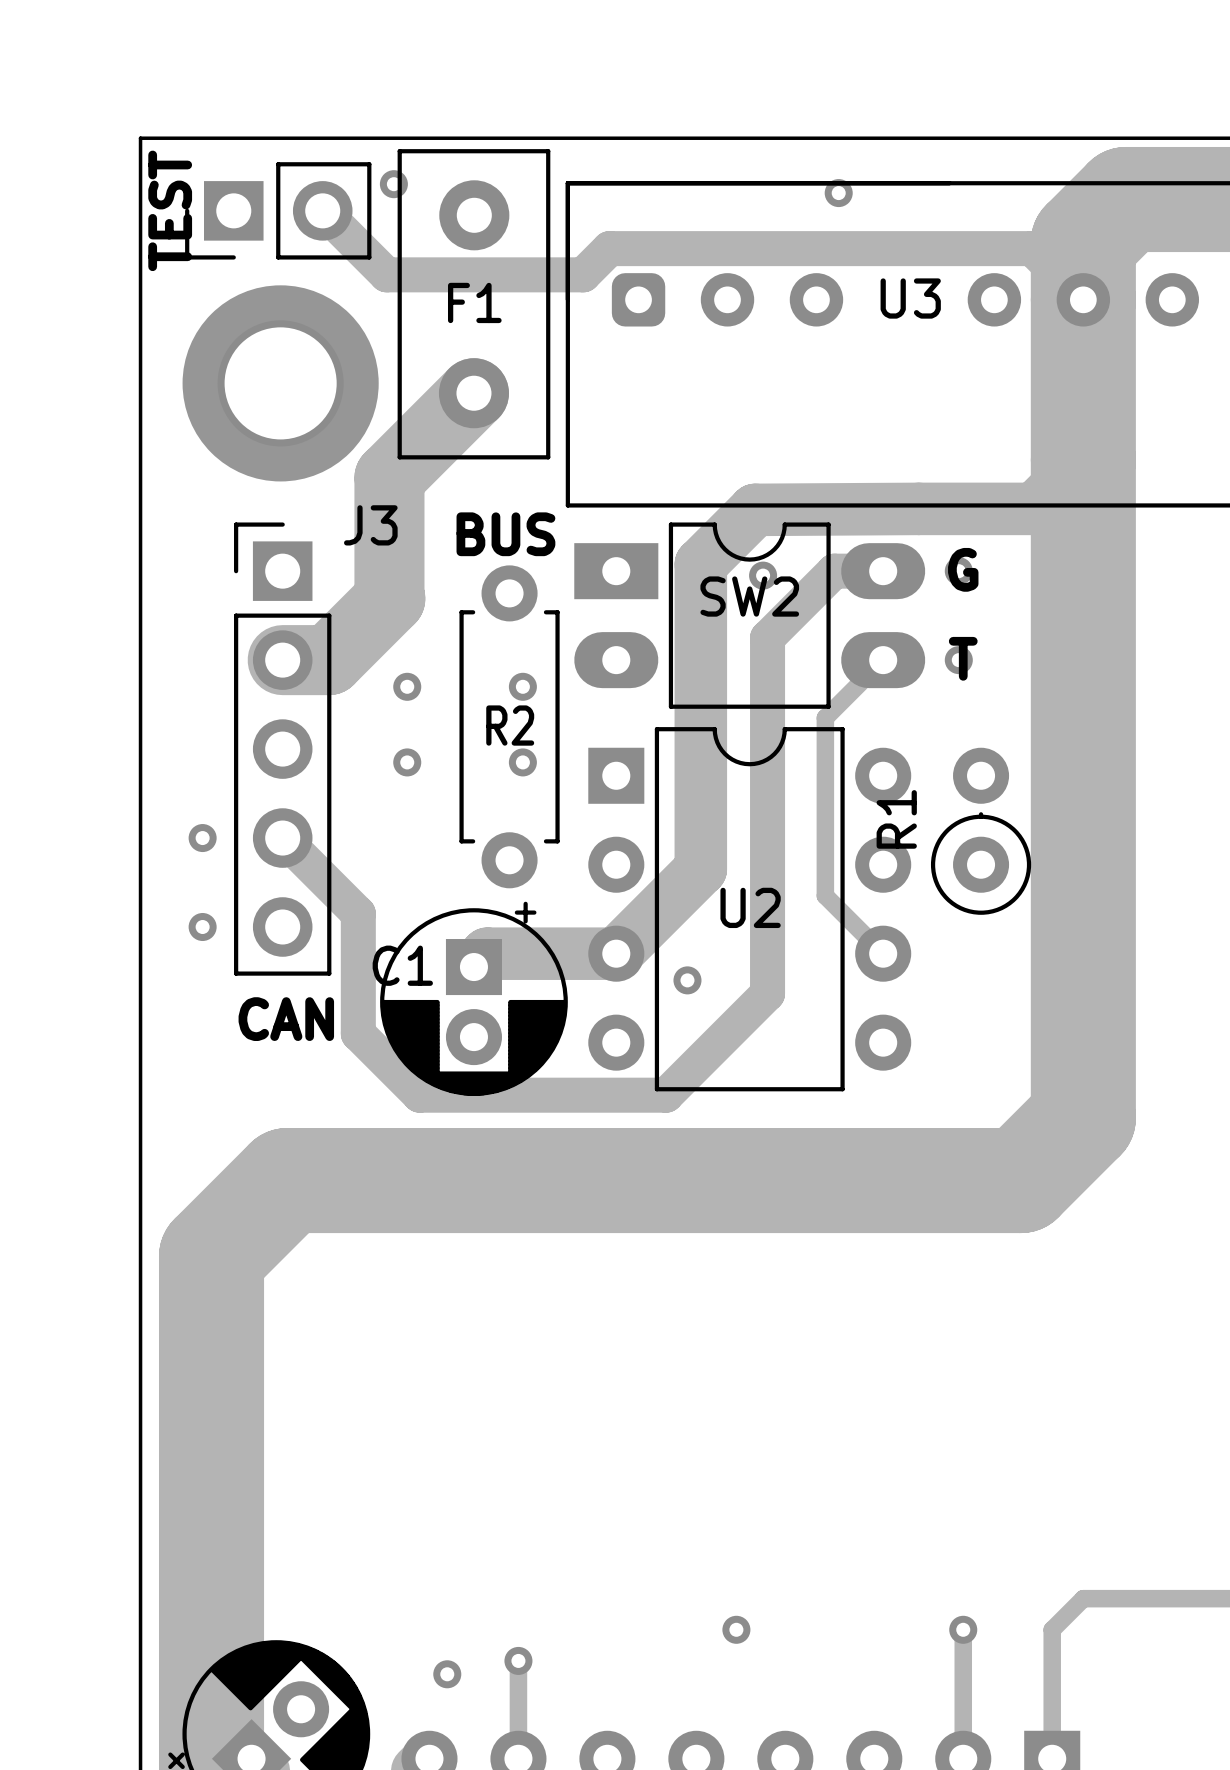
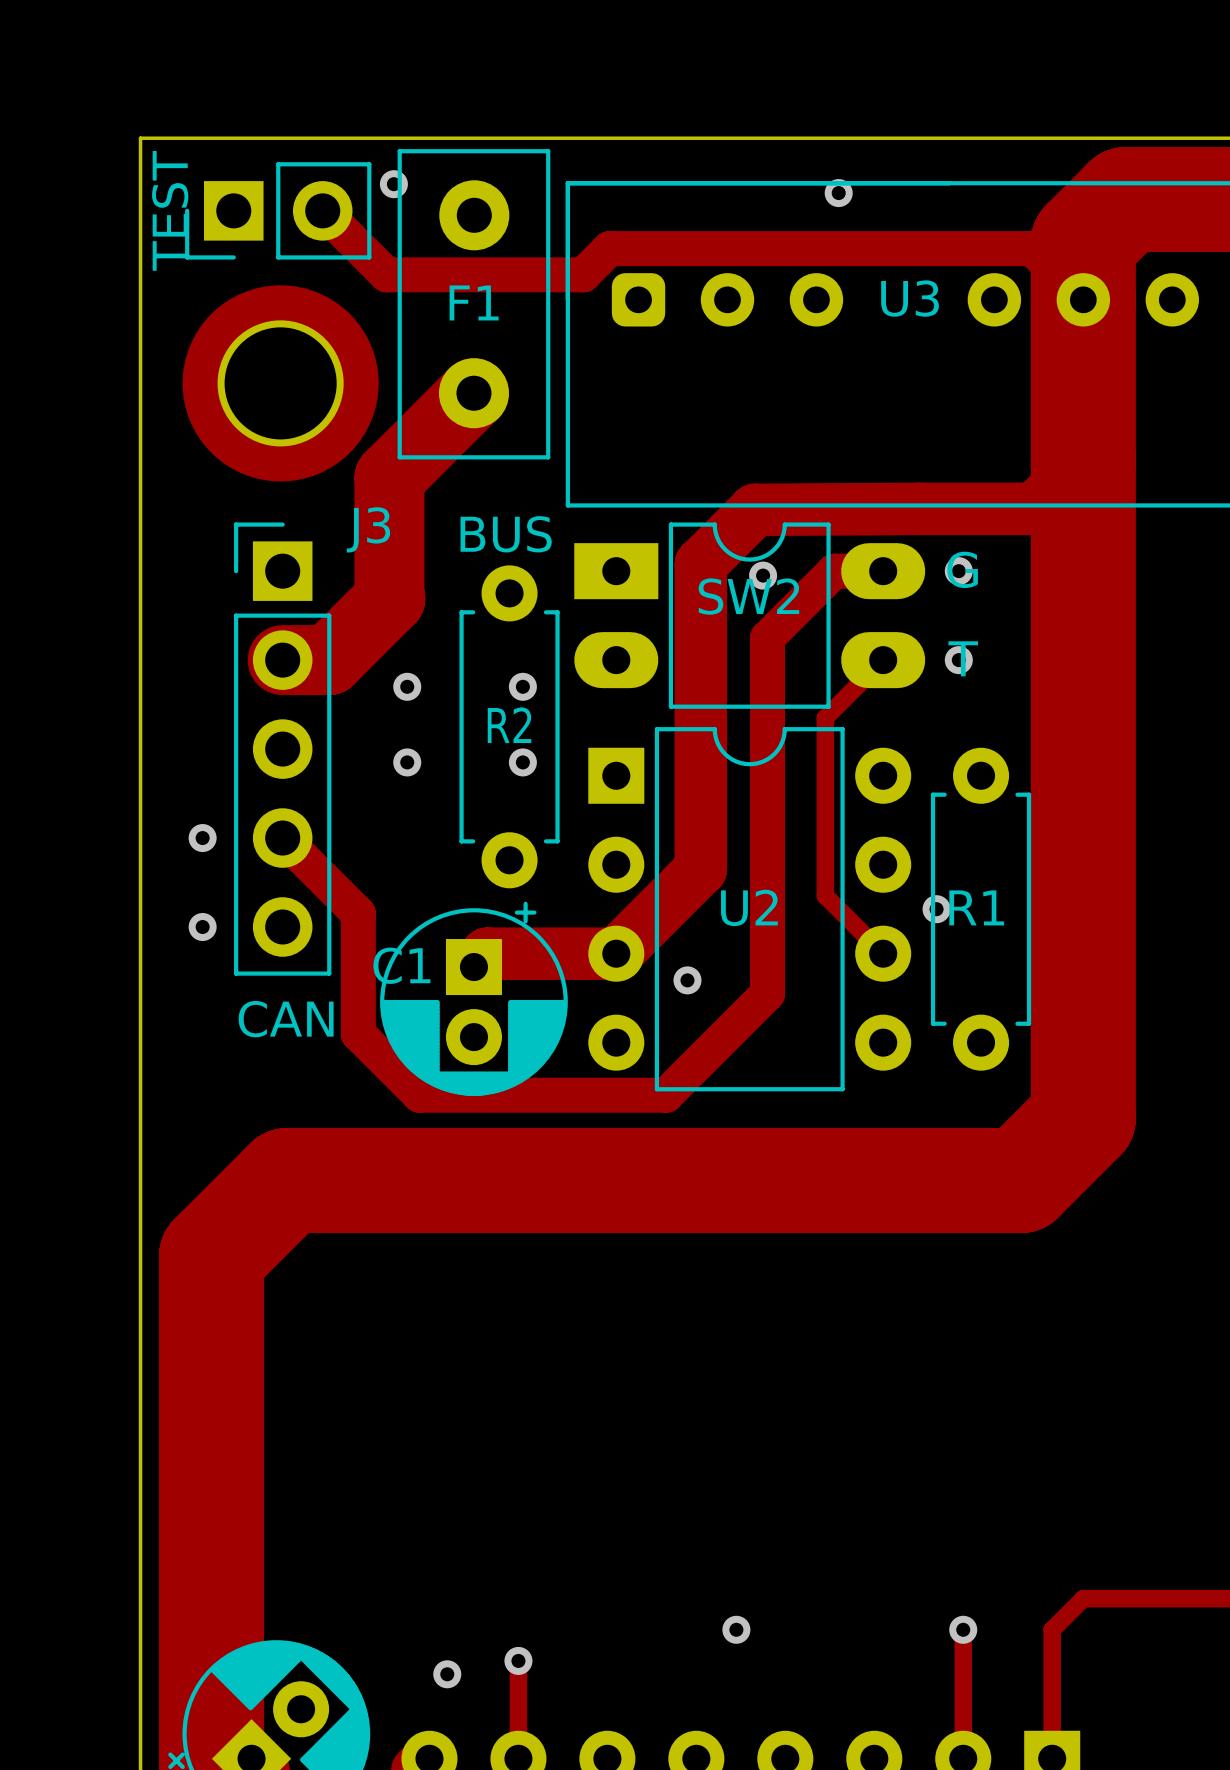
R1 footprint: [930, 747, 1032, 915] -> [930, 747, 1032, 1071]
R1 name position: R1 (896, 819) -> R1 (976, 907)
via: none -> (936, 909)

